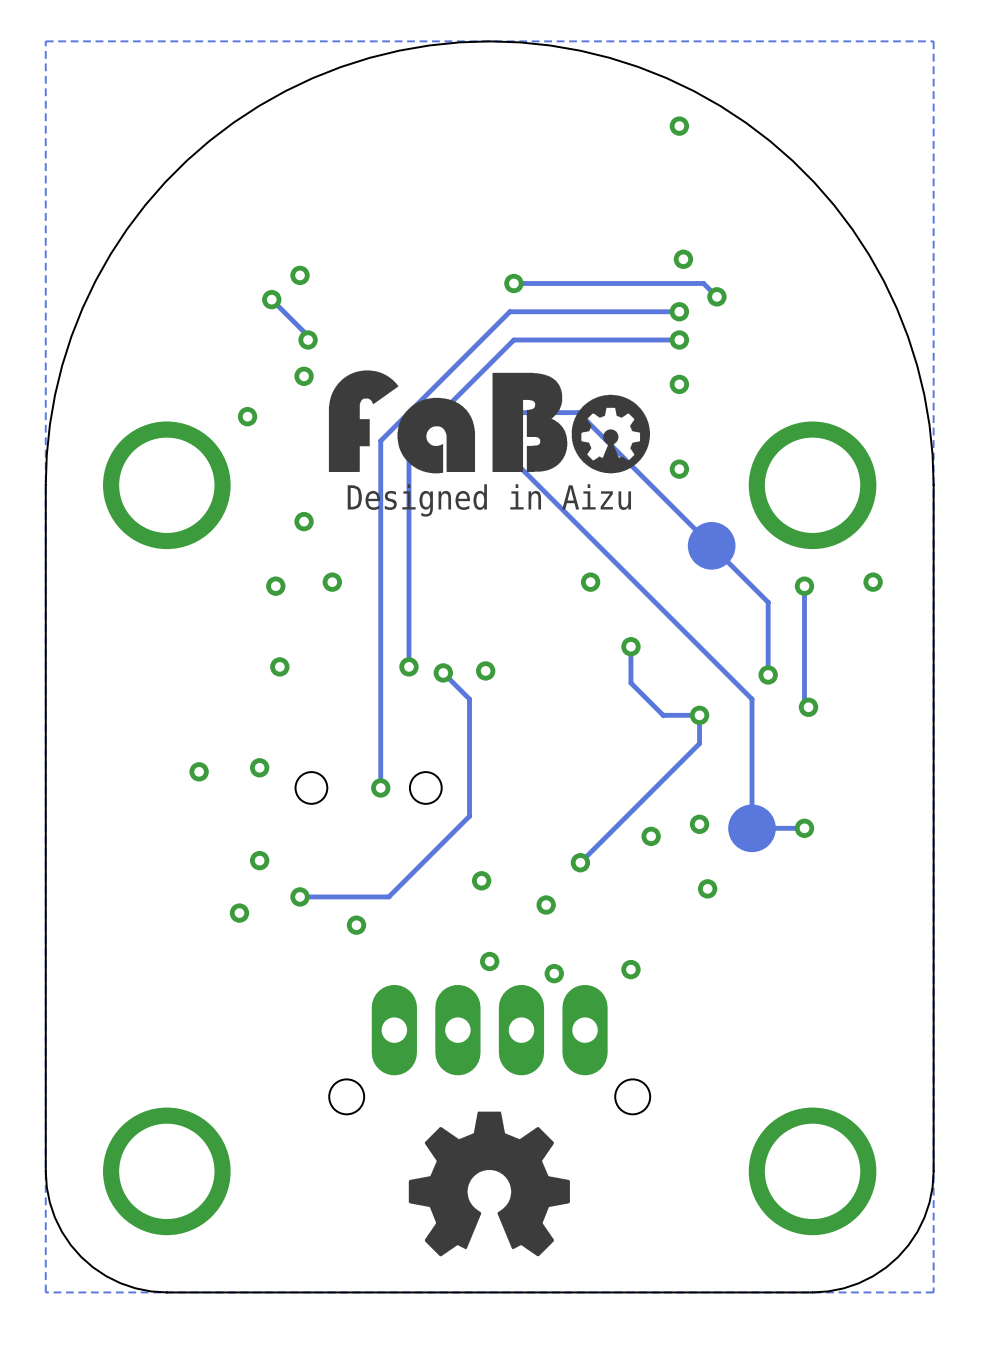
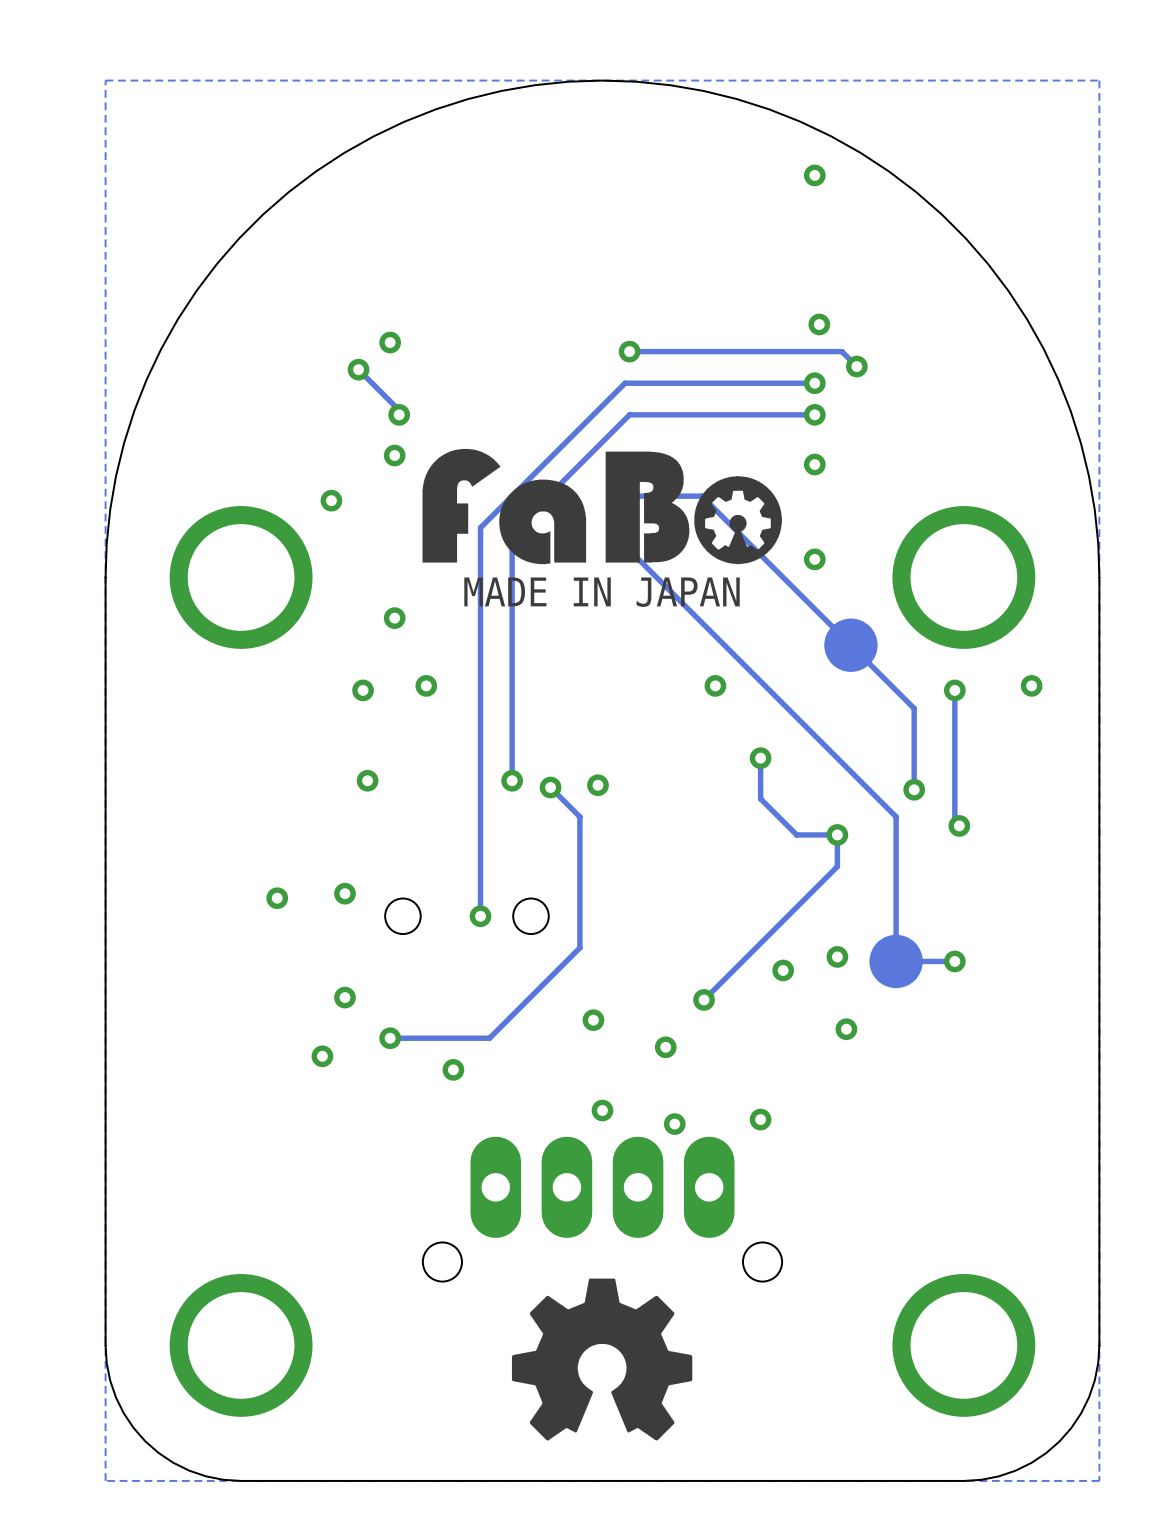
text: Designed in Aizu (489, 500) -> MADE IN JAPAN (602, 592)

